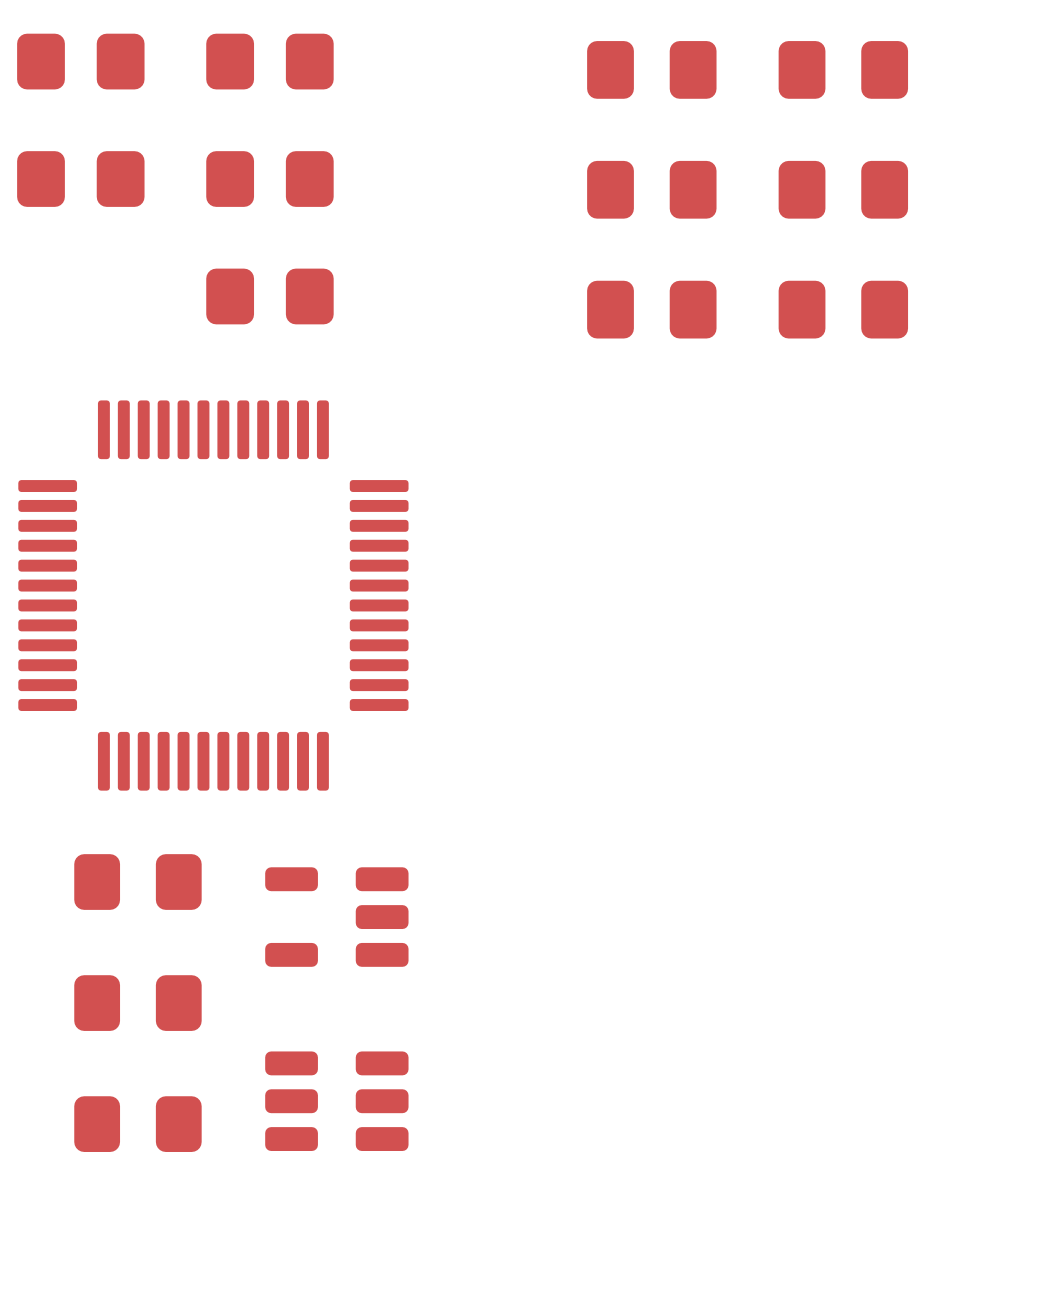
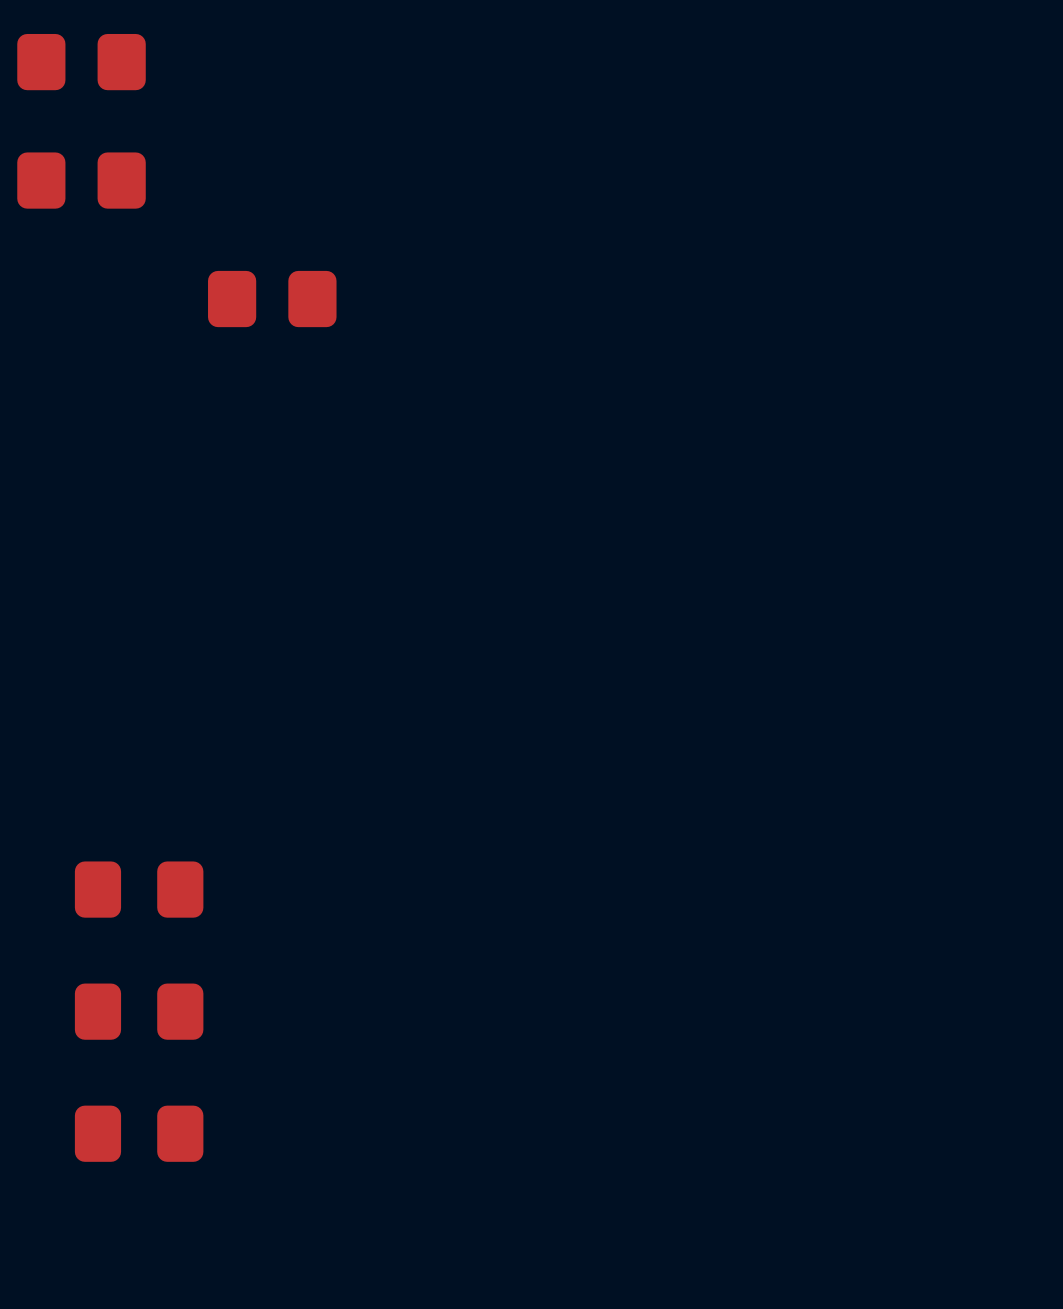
part: (269, 61) -> none
part: (651, 69) -> none
part: (843, 69) -> none
part: (269, 179) -> none
part: (651, 189) -> none
part: (843, 189) -> none
part: (651, 309) -> none
part: (843, 309) -> none
part: (213, 595) -> none
part: (336, 917) -> none
part: (336, 1101) -> none

